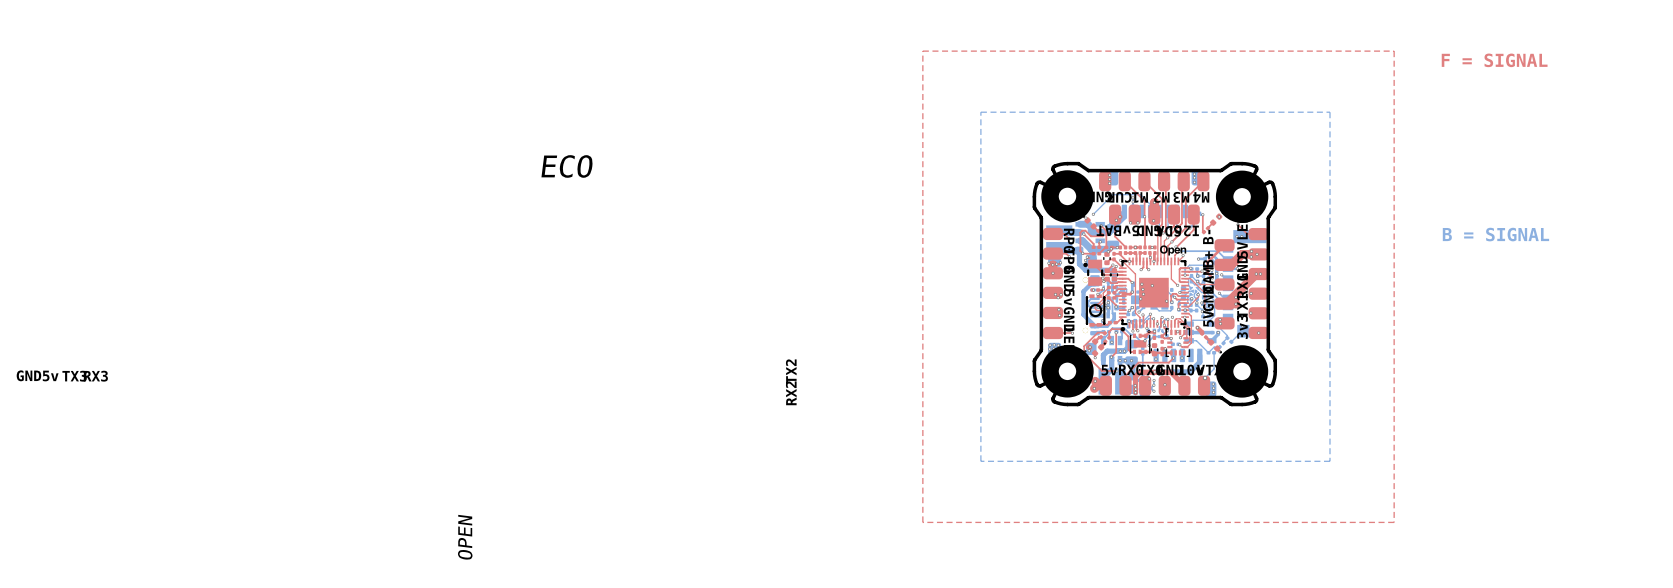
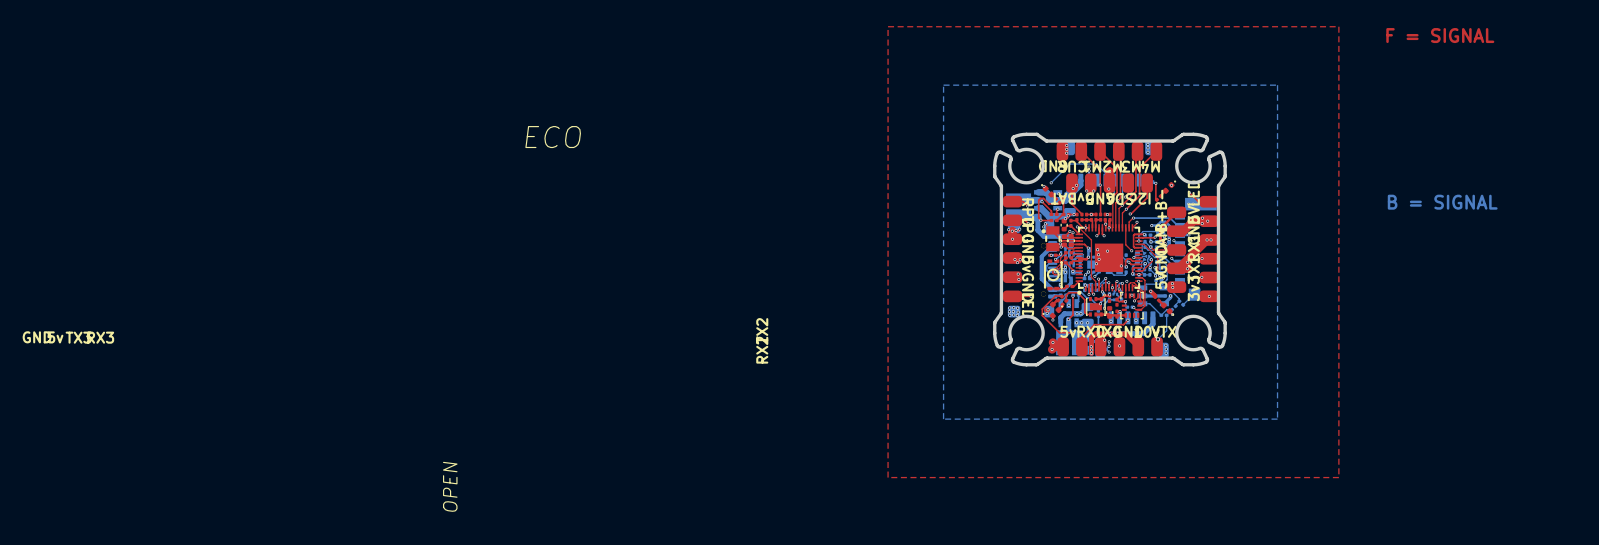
drawing: [1041, 170, 1094, 223] -> none
drawing: [1215, 170, 1269, 223] -> none
drawing: [1160, 245, 1187, 256] -> none
drawing: [1041, 345, 1094, 398] -> none
drawing: [1215, 345, 1269, 398] -> none

